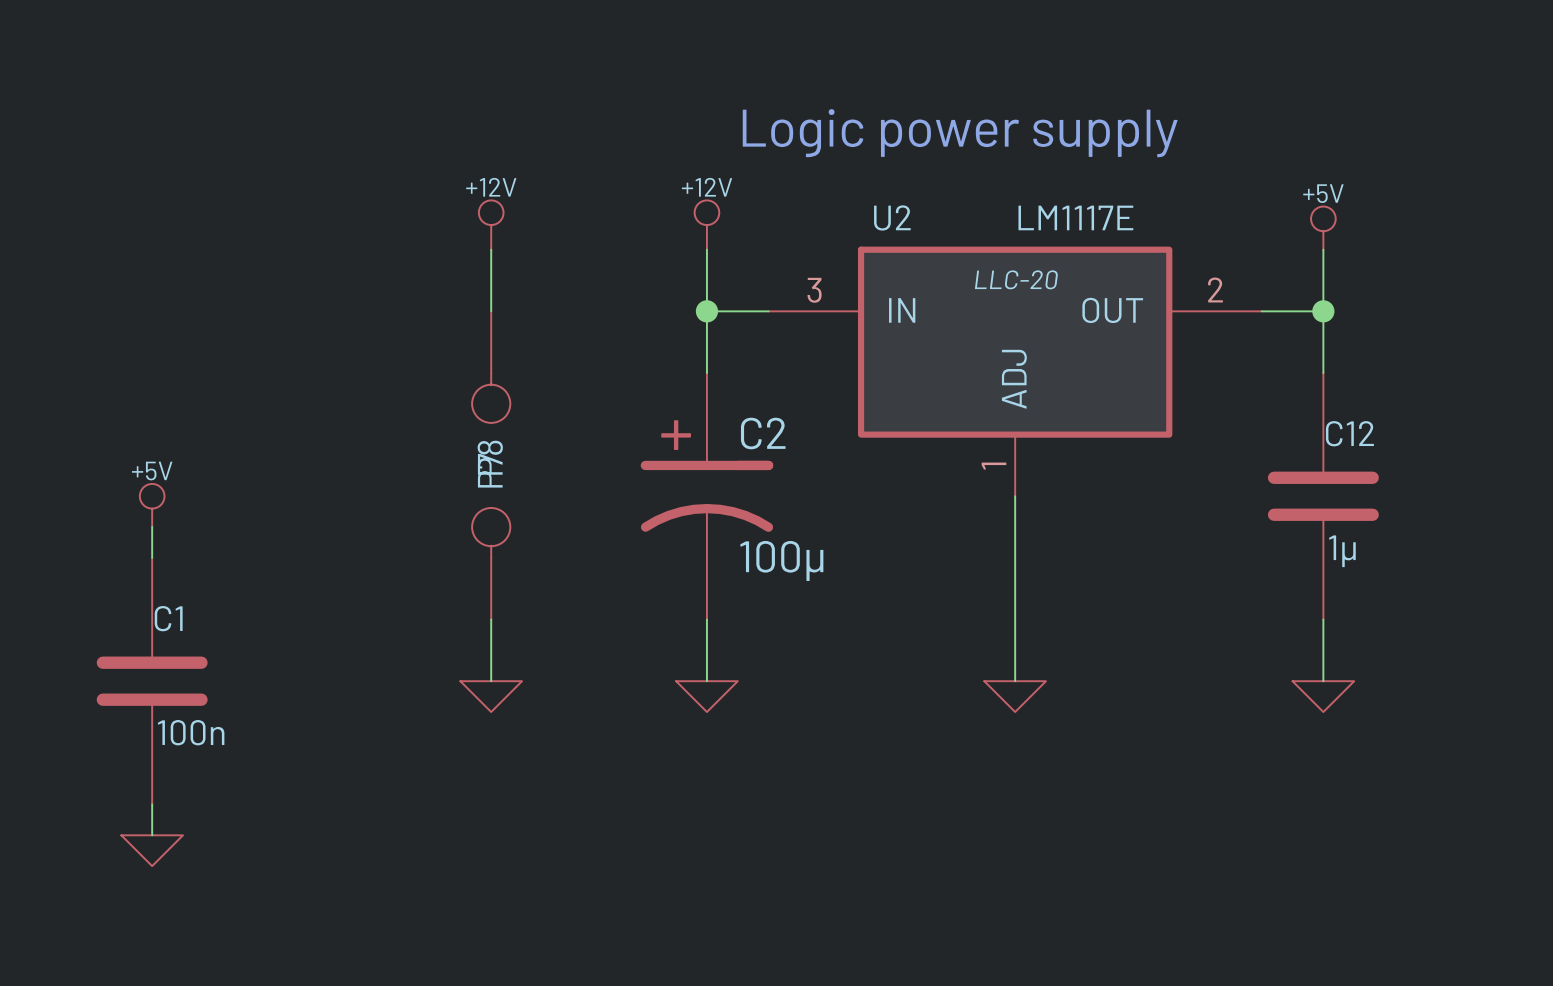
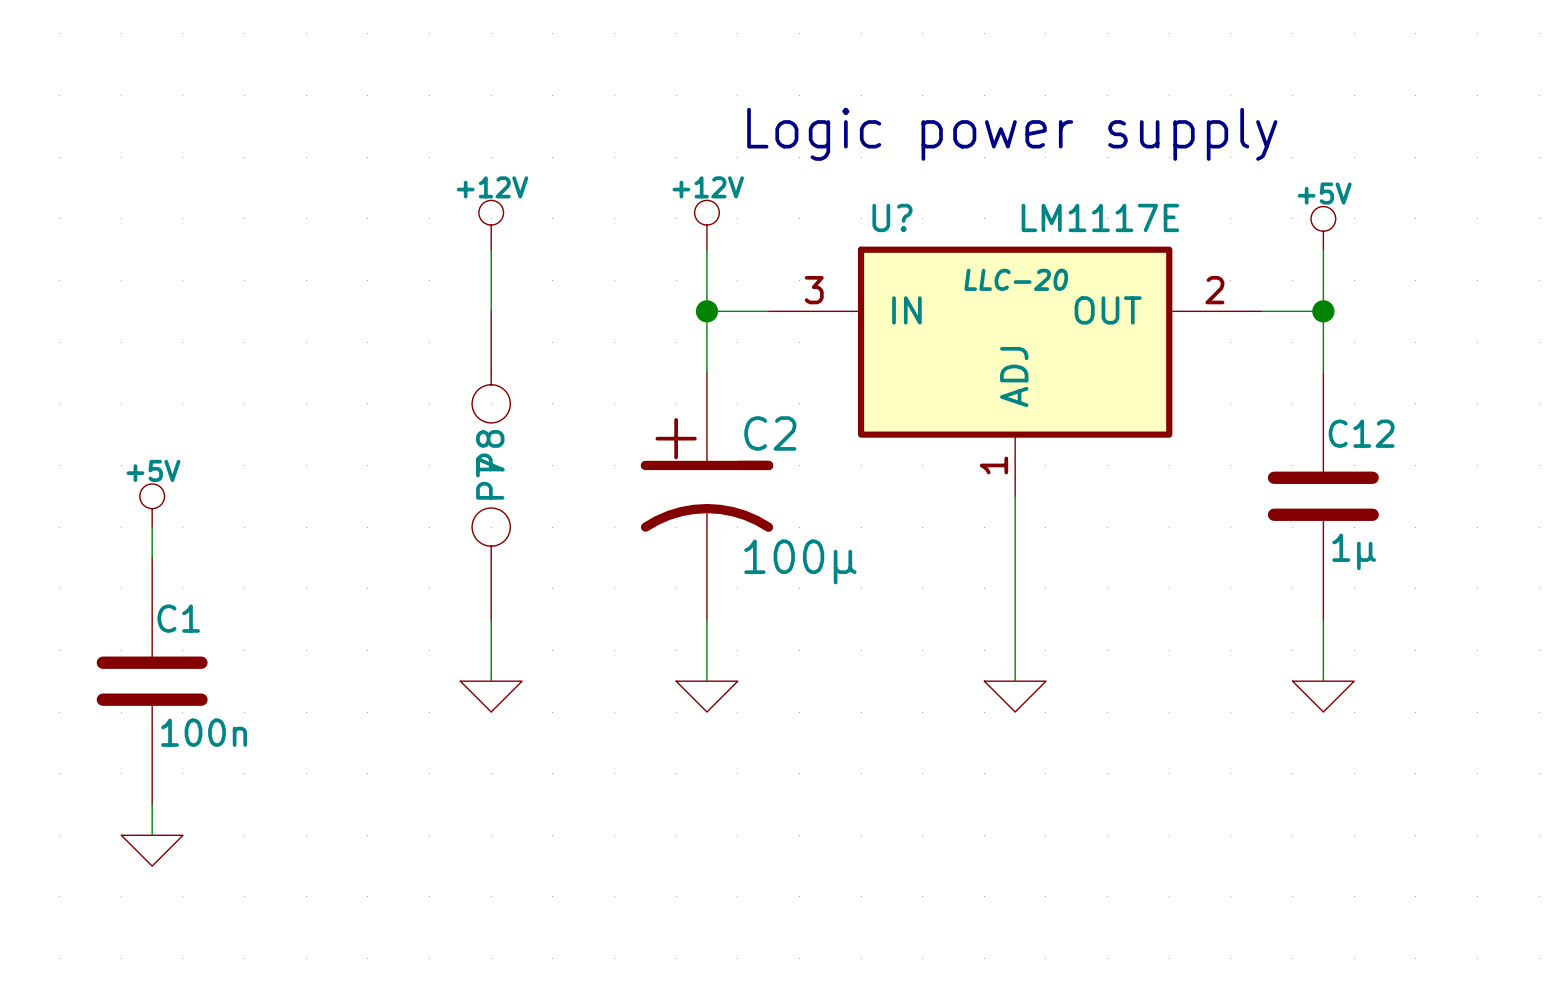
U2 name: U2 (892, 217) -> U? (892, 217)

